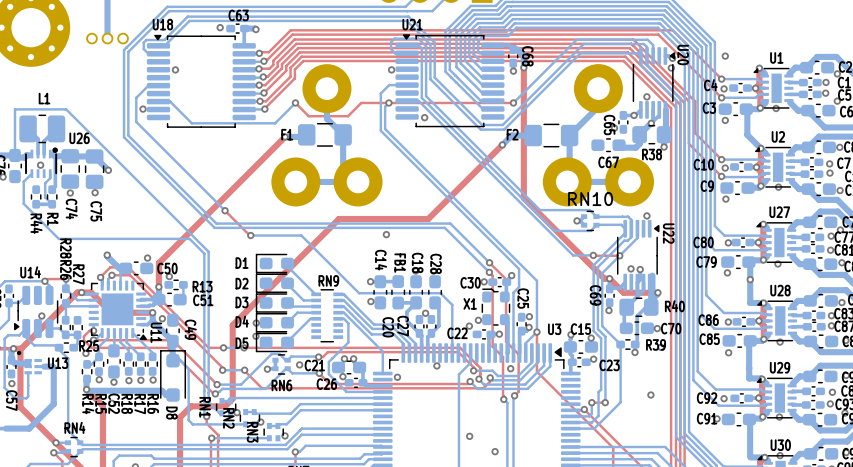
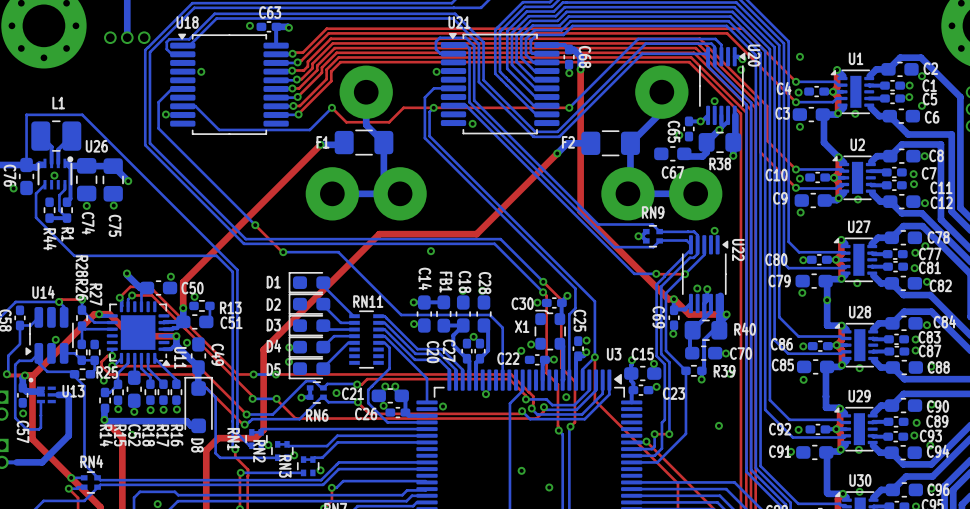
RN10 name: RN10 (590, 199) -> RN9 (653, 212)
RN9 name: RN9 (328, 280) -> RN11 (368, 301)

